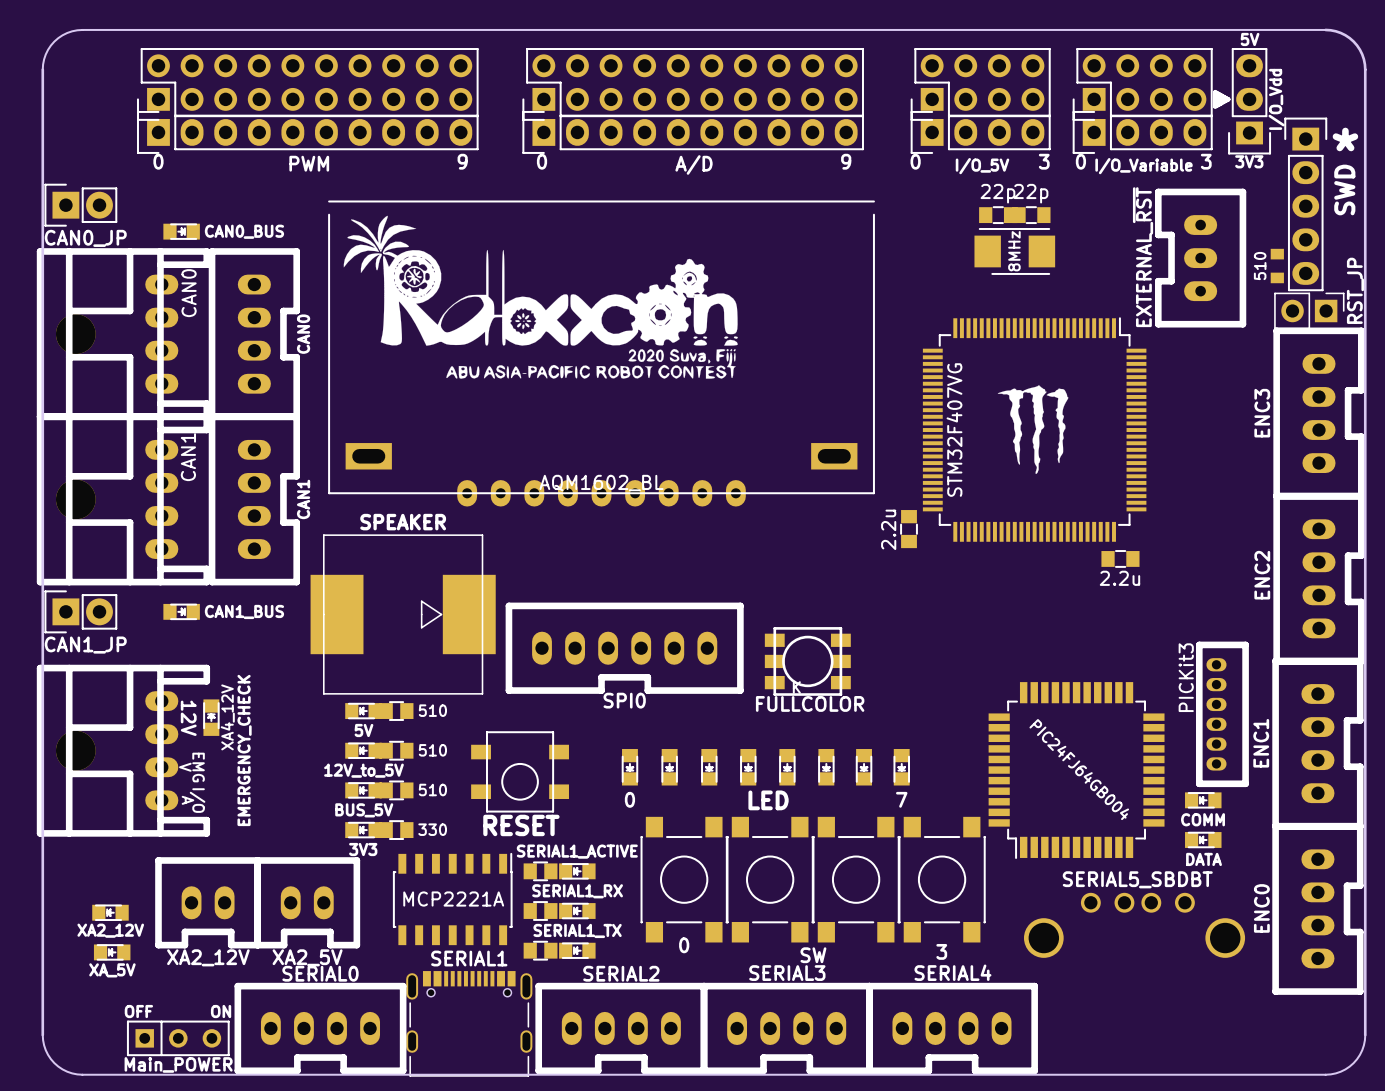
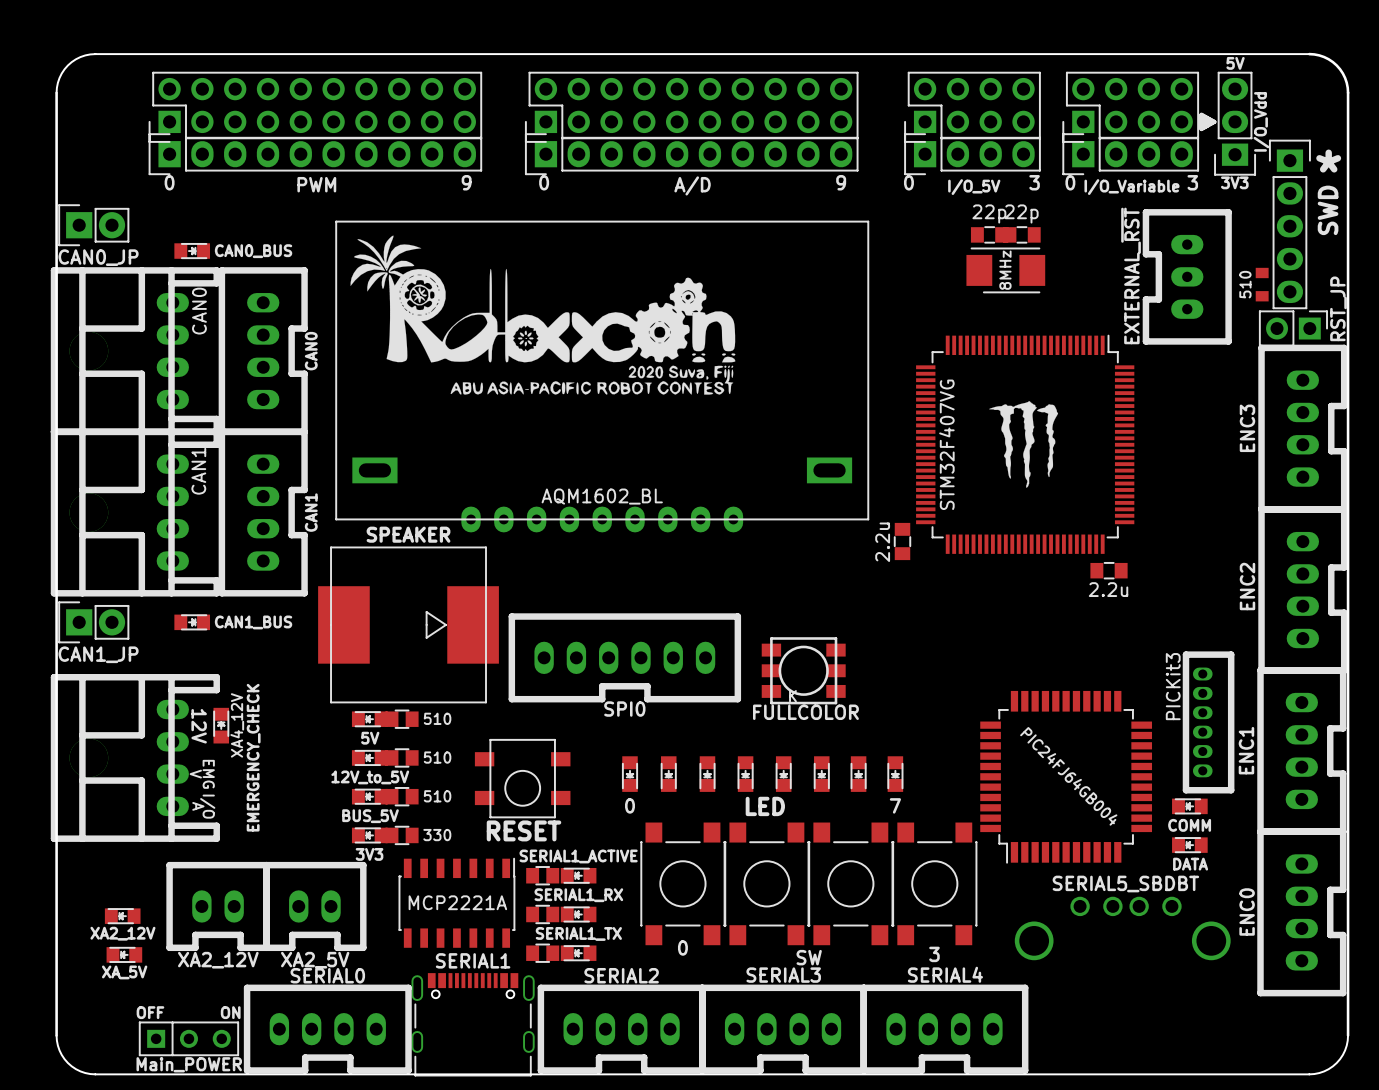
part footprint: [328, 200, 875, 507] -> [335, 220, 870, 533]

